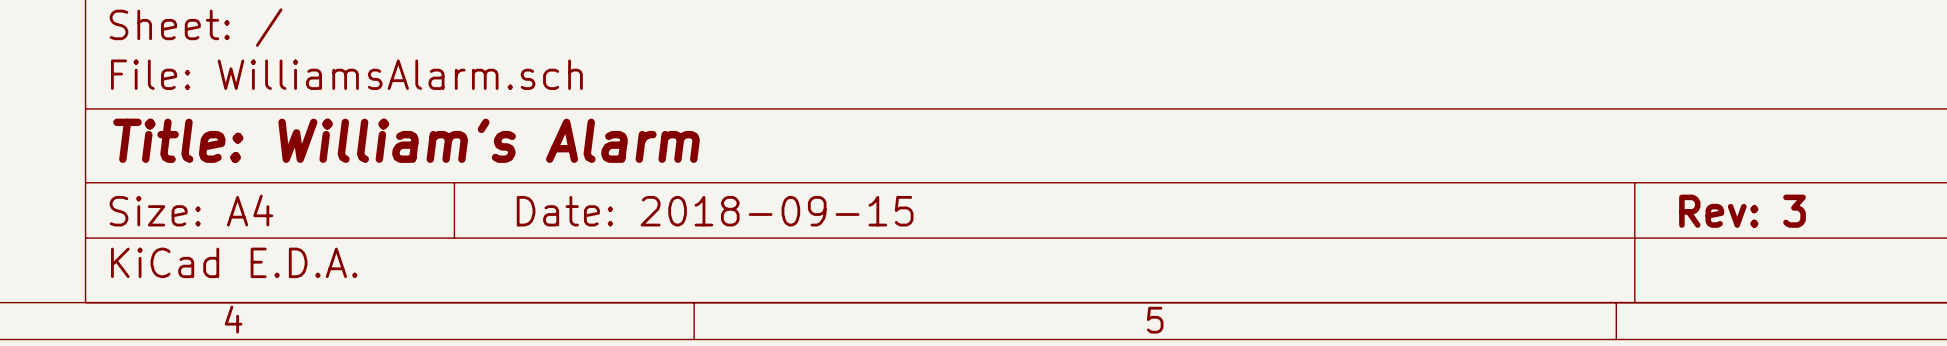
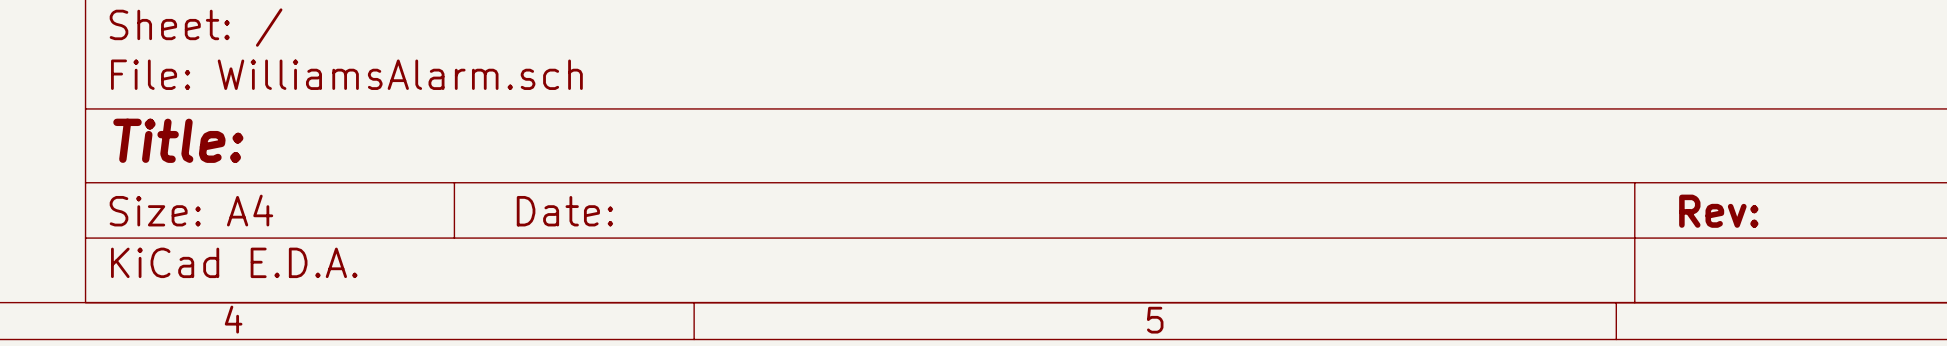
title block: Title: William's Alarm (406, 140) -> Title: (178, 140)
title block: Date: 2018-09-15 (715, 211) -> Date: (564, 211)
title block: Rev: 3 (1742, 211) -> Rev: (1718, 211)

